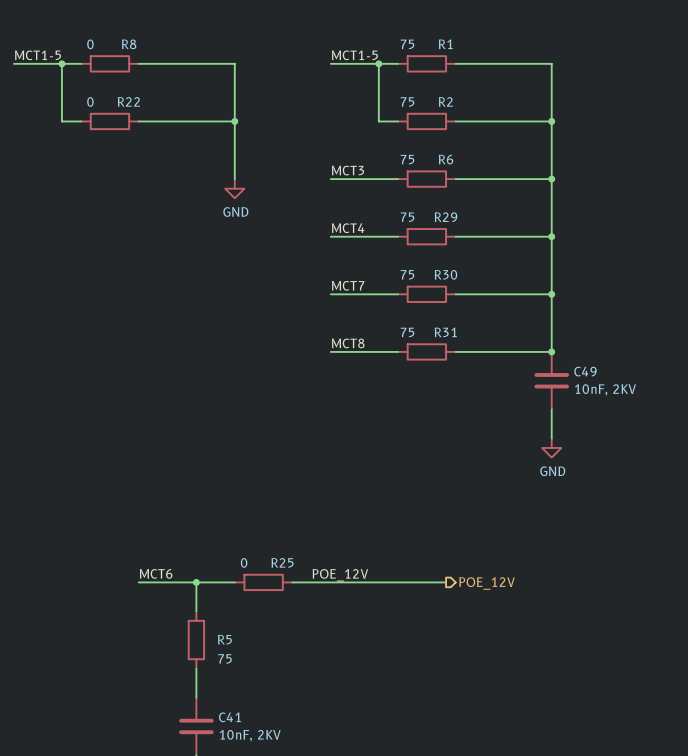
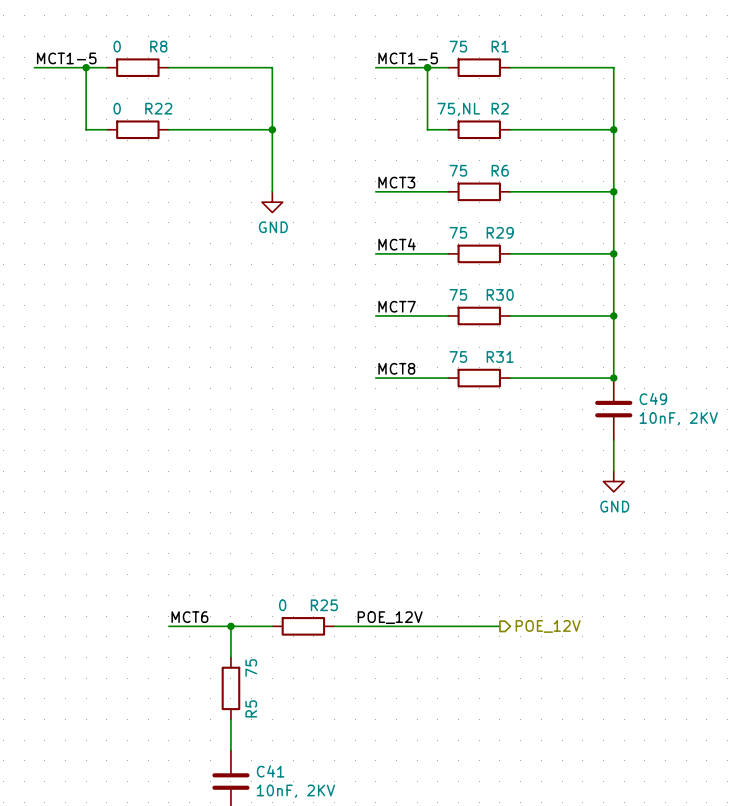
R2 value: 75 (407, 101) -> 75,NL (458, 109)
R5 name rotation: 0° (224, 639) -> 90° counterclockwise (251, 708)
R5 value rotation: 0° (225, 658) -> 90° counterclockwise (251, 667)
R5 value position: 75 (225, 658) -> 75 (251, 667)

